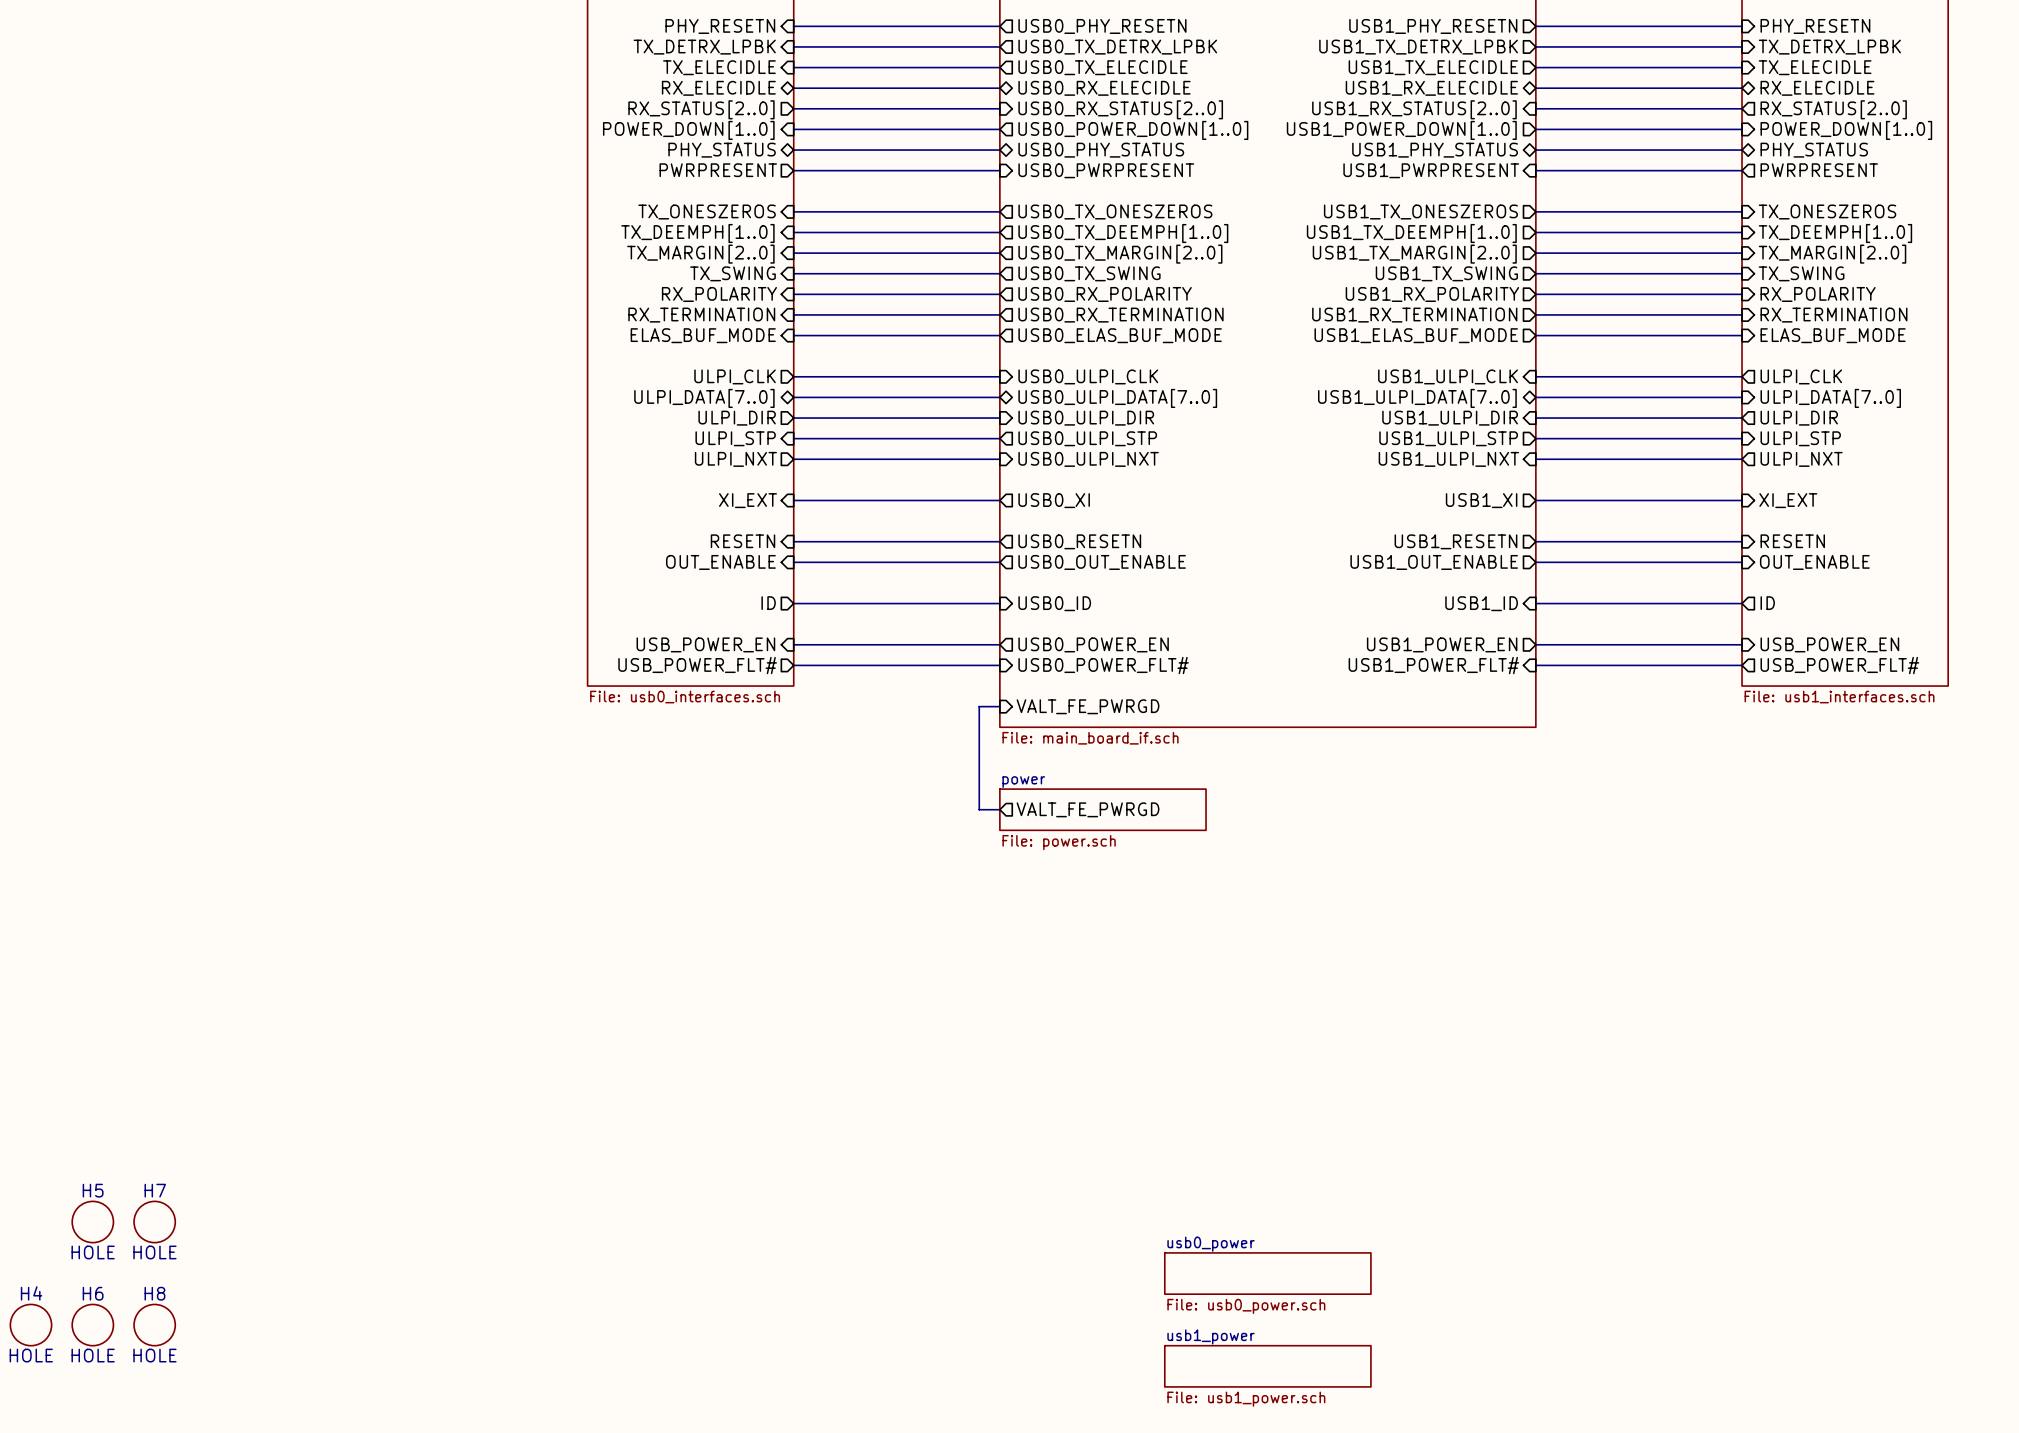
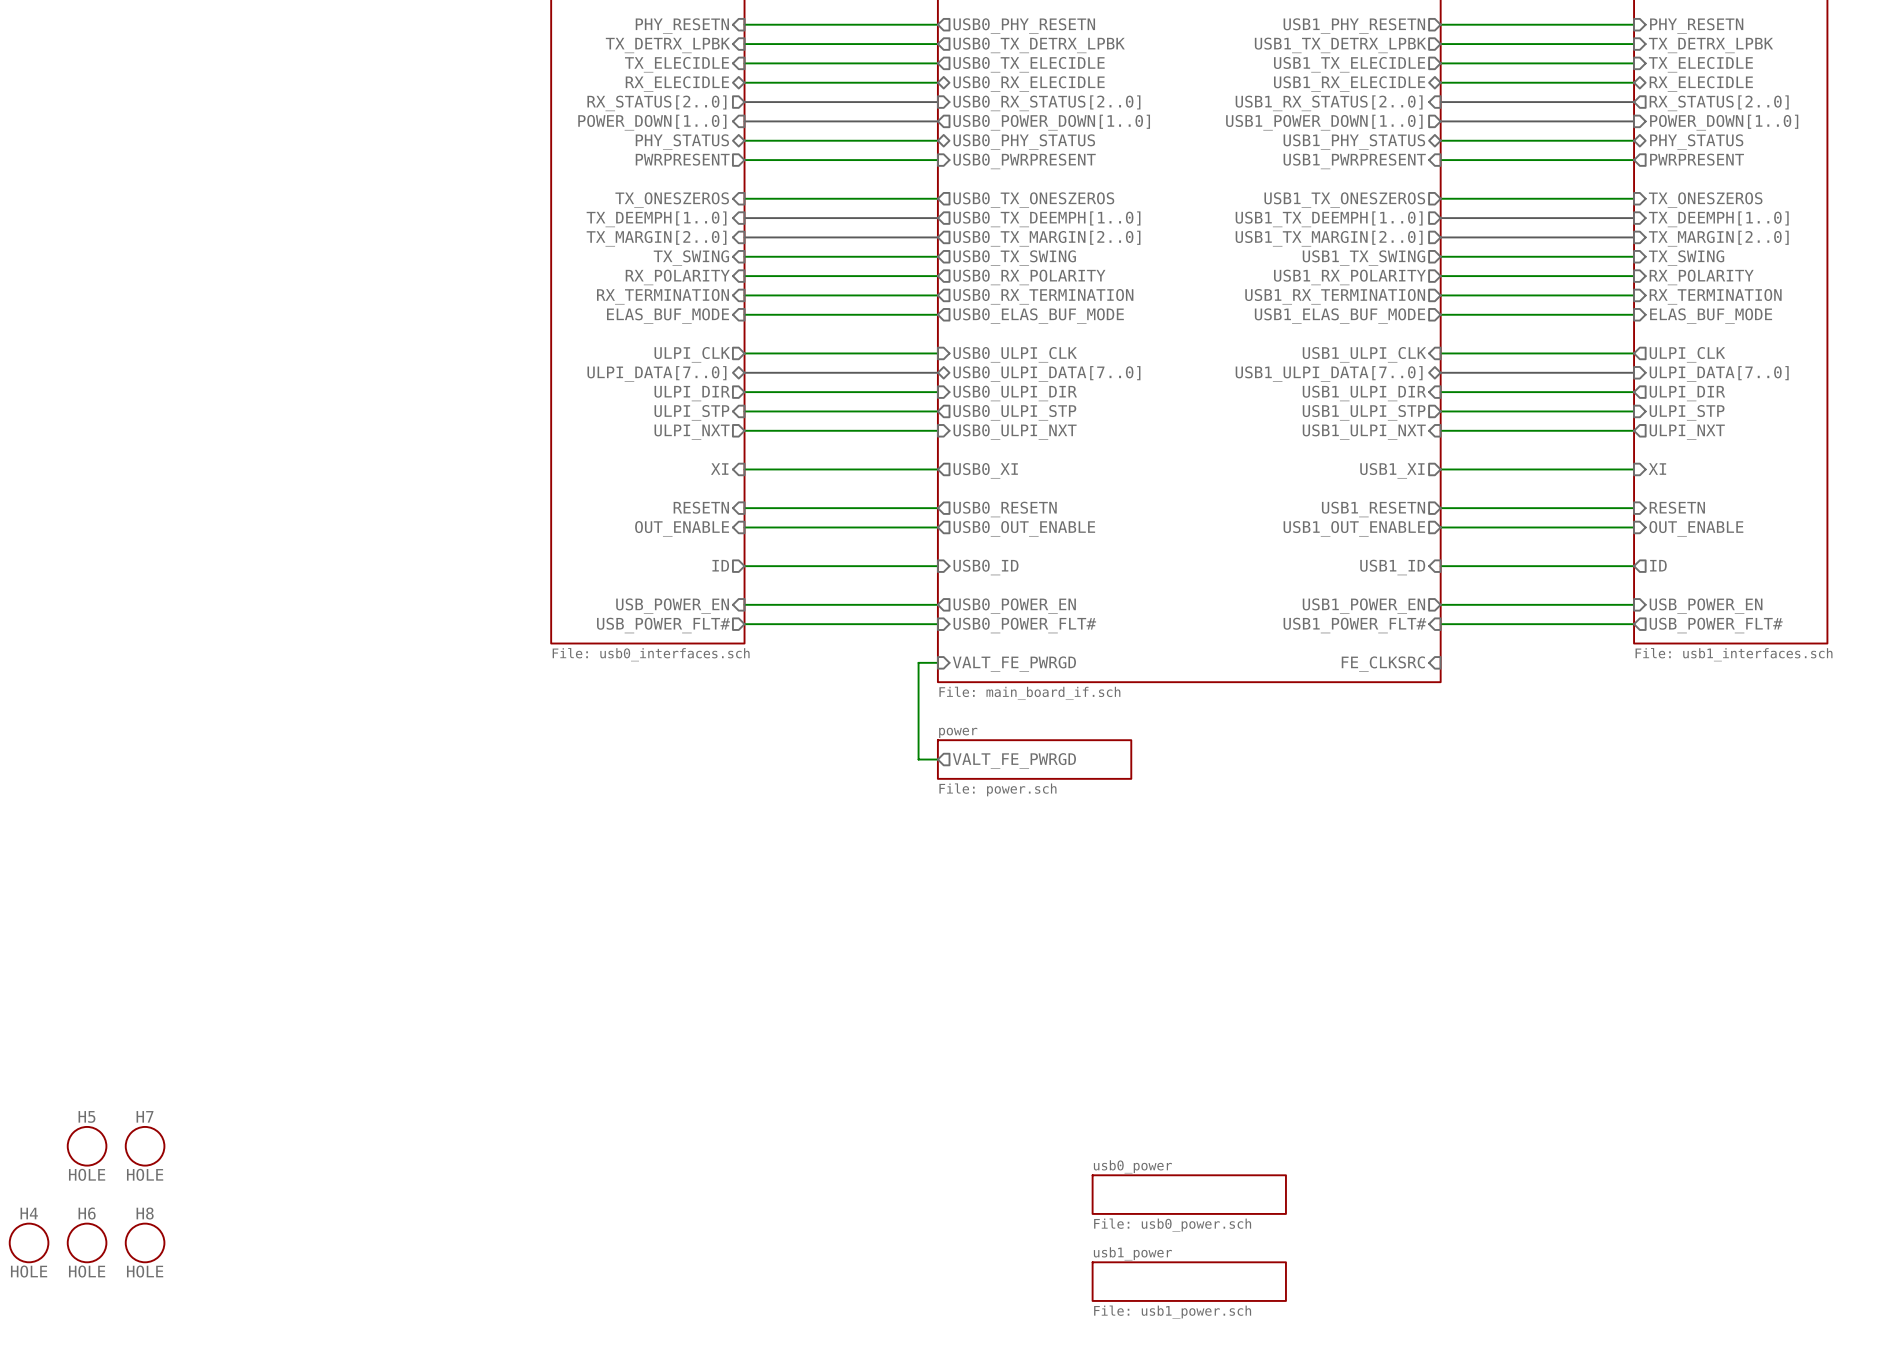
sheet pin: XI_EXT (748, 500) -> XI (719, 469)
sheet pin: XI_EXT (1788, 500) -> XI (1657, 469)
sheet pin: none -> FE_CLKSRC (1383, 664)

